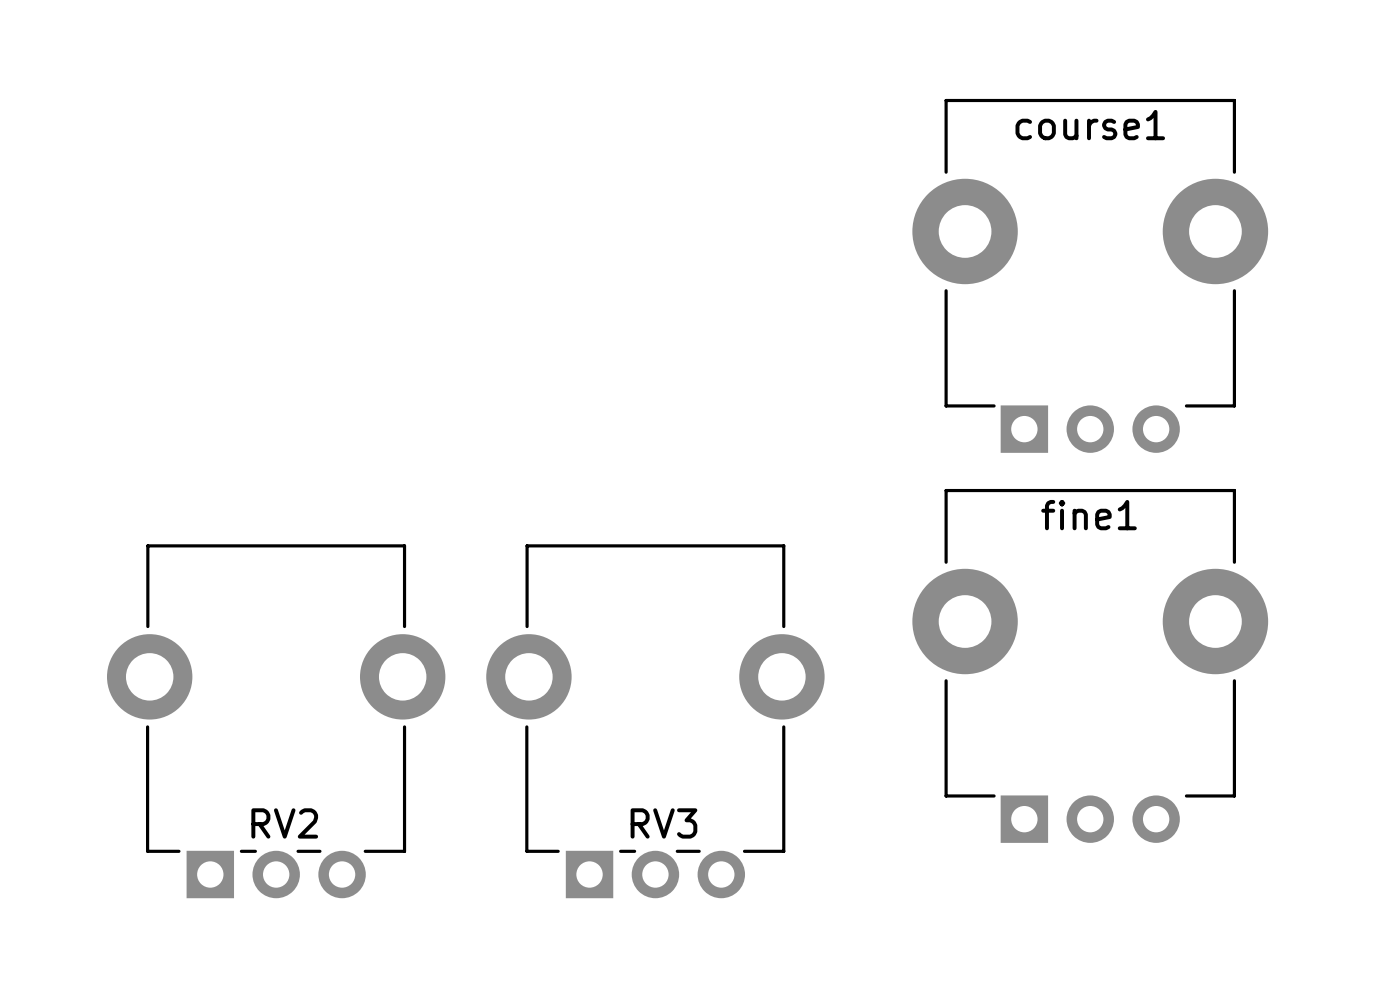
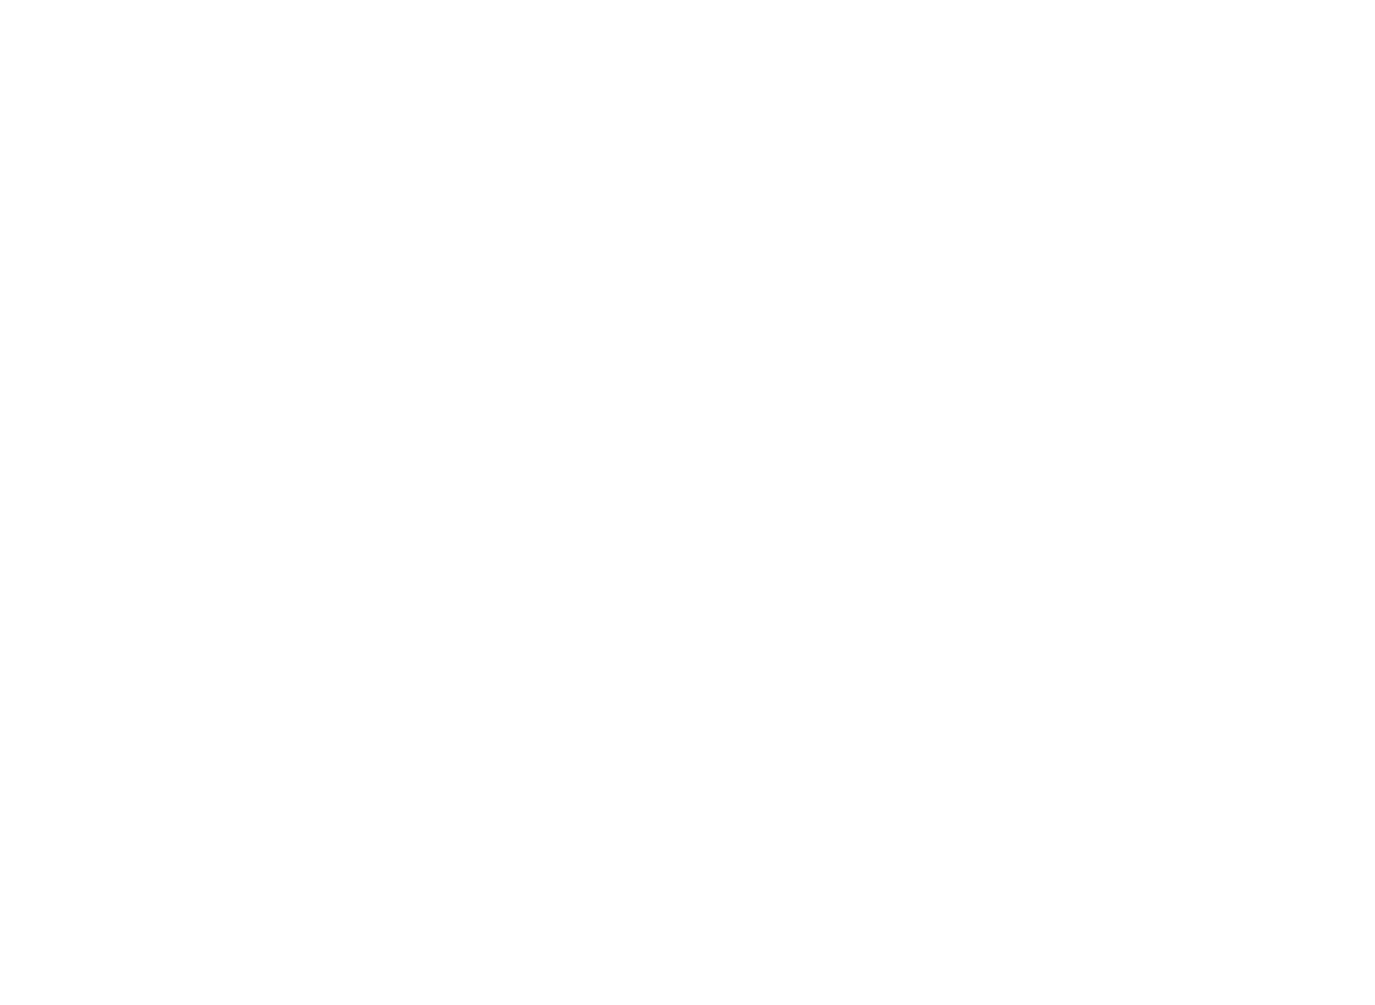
course1: (1090, 275) -> none
fine1: (1090, 665) -> none
RV2: (276, 721) -> none
RV3: (655, 721) -> none

